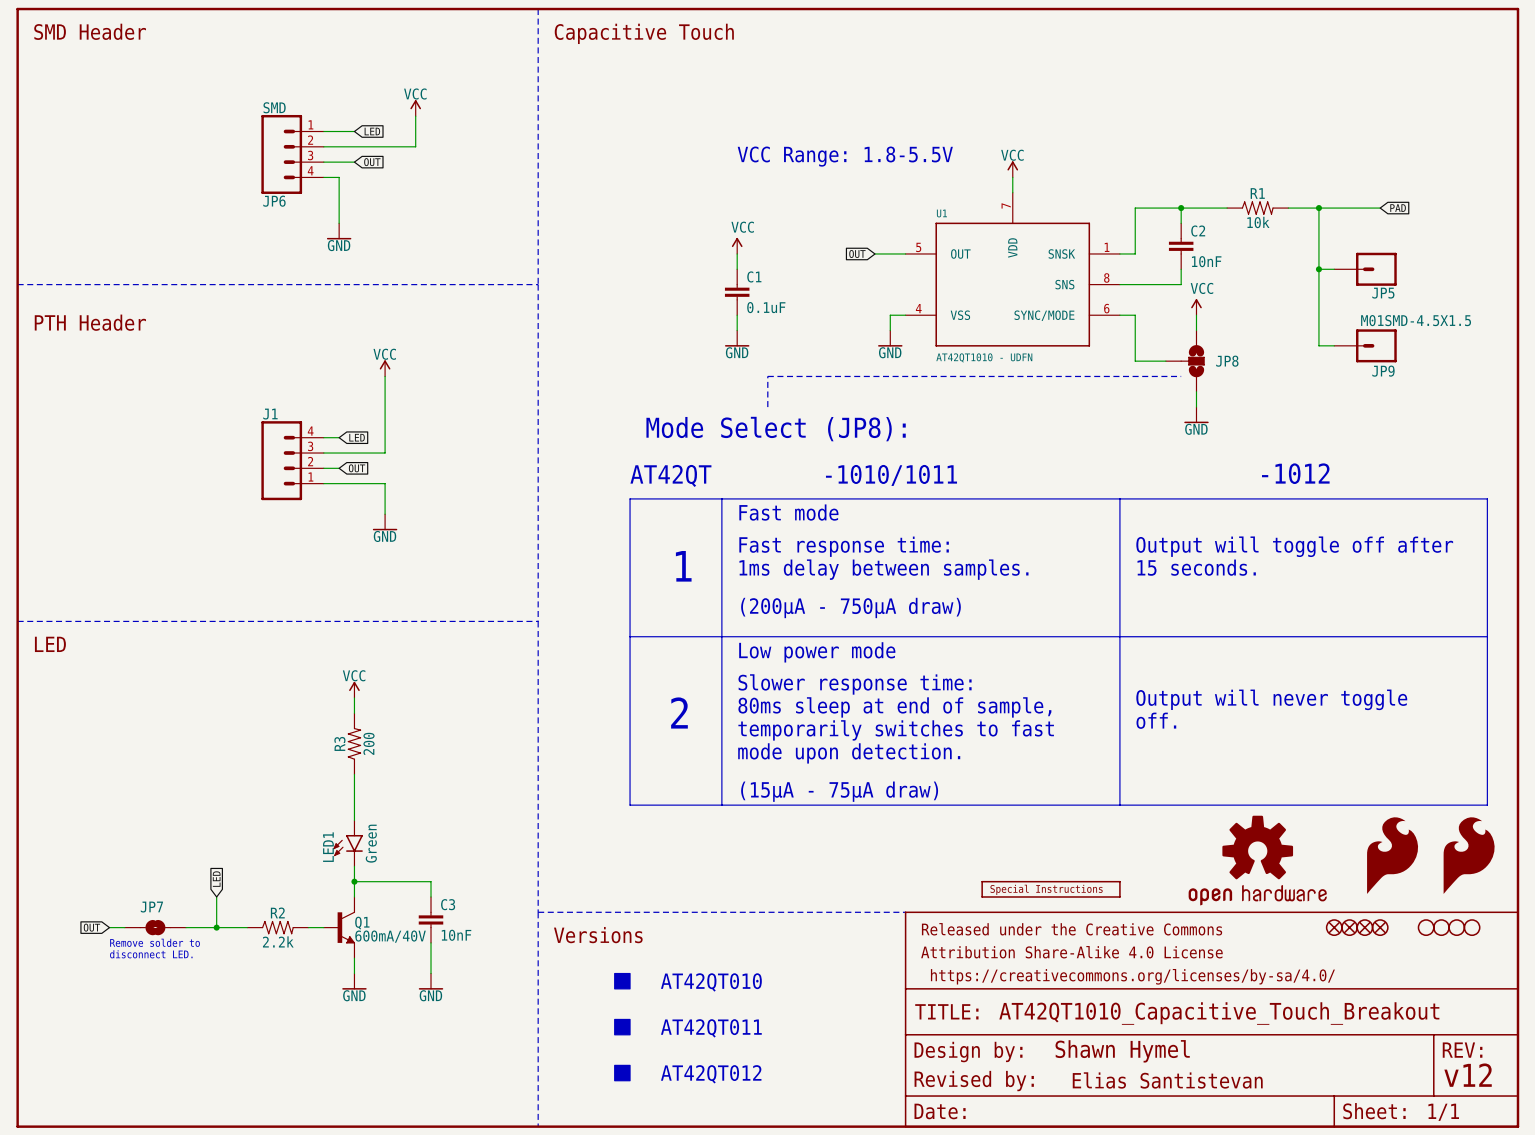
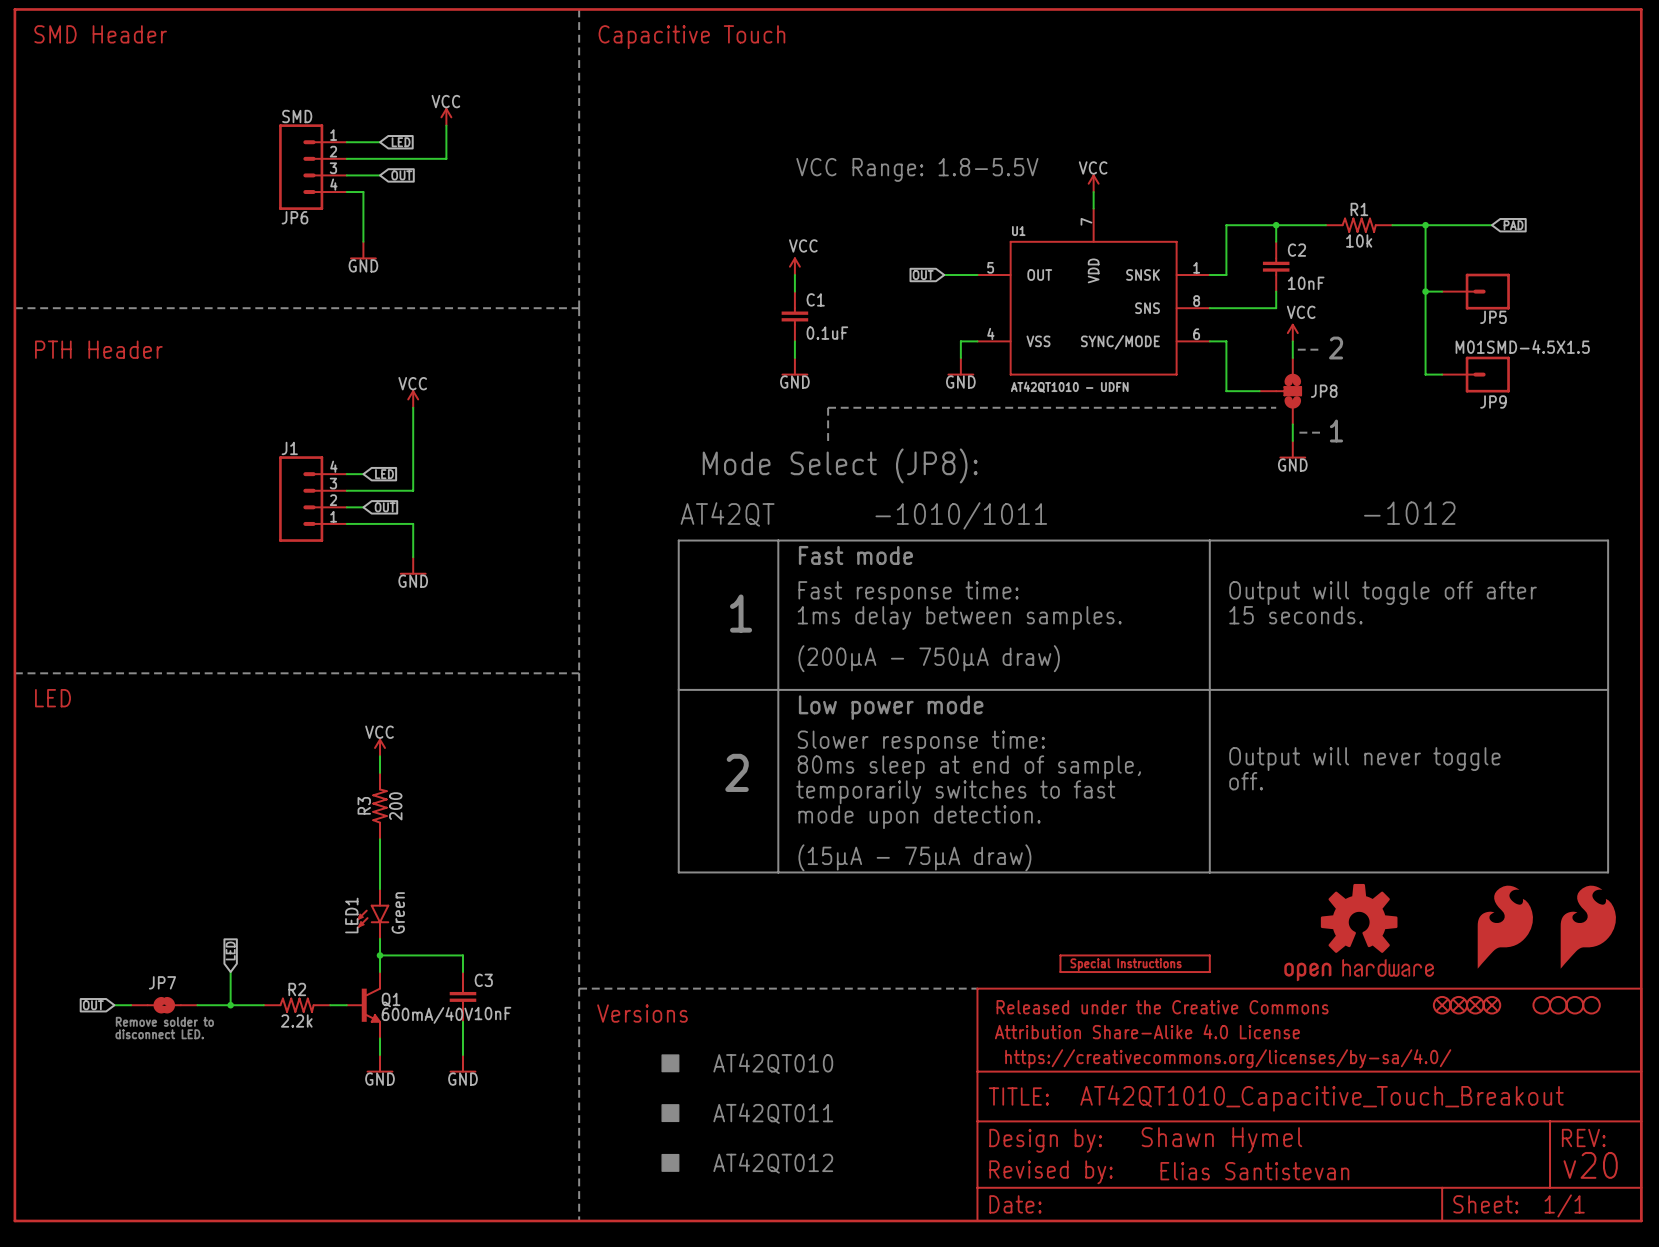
text: none -> 2 (1336, 348)
line: none -> (1297, 349) (1321, 349)
text: none -> 1 (1336, 431)
line: none -> (1299, 432) (1321, 432)
text: v12 (1468, 1075) -> v20 (1590, 1165)

